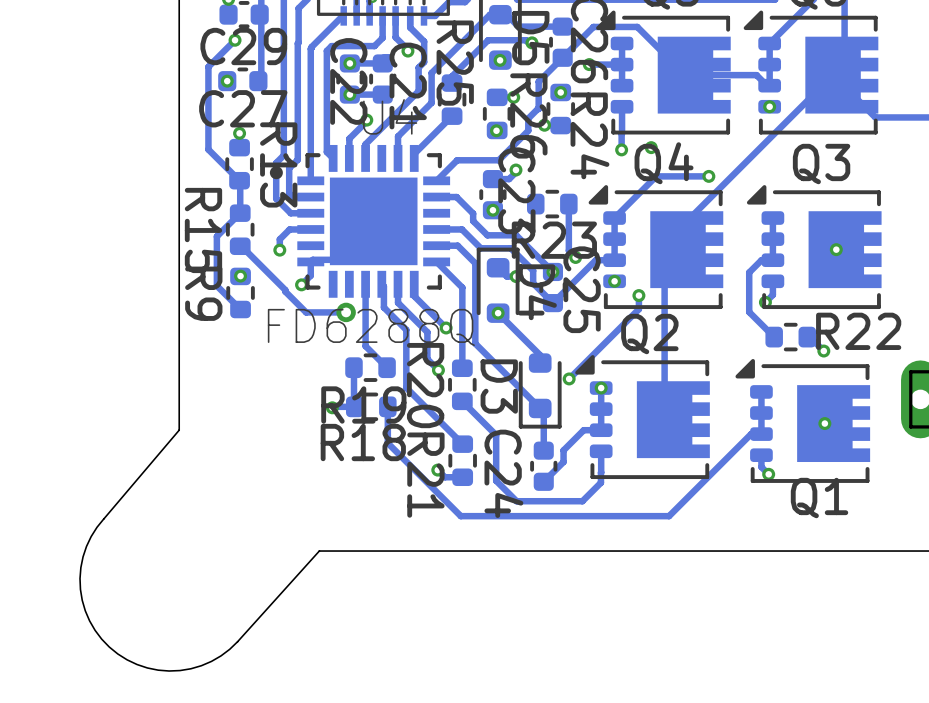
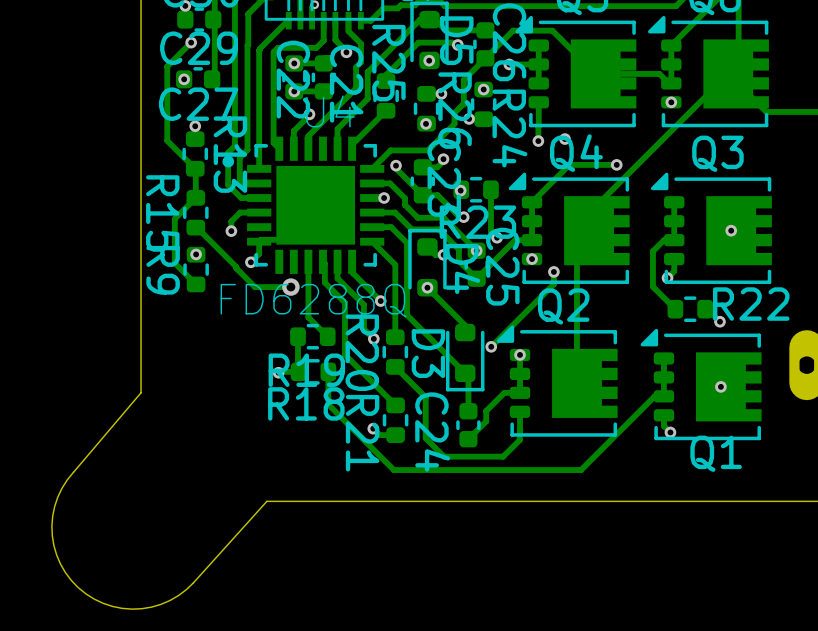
track: none -> (396, 165) (396, 168) (422, 195) (437, 195) (459, 217) (463, 217)
via: none -> (396, 165)
via: none -> (460, 190)
via: (492, 210) -> none
via: none -> (384, 198)
via: none -> (463, 217)

